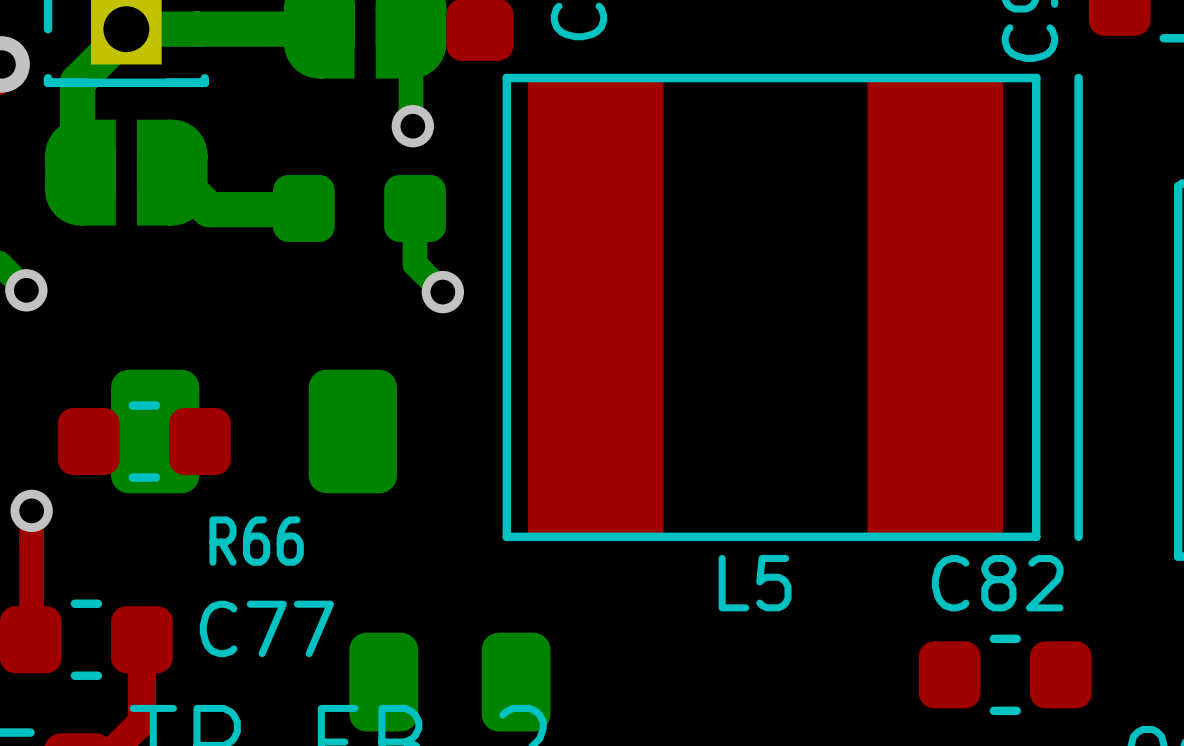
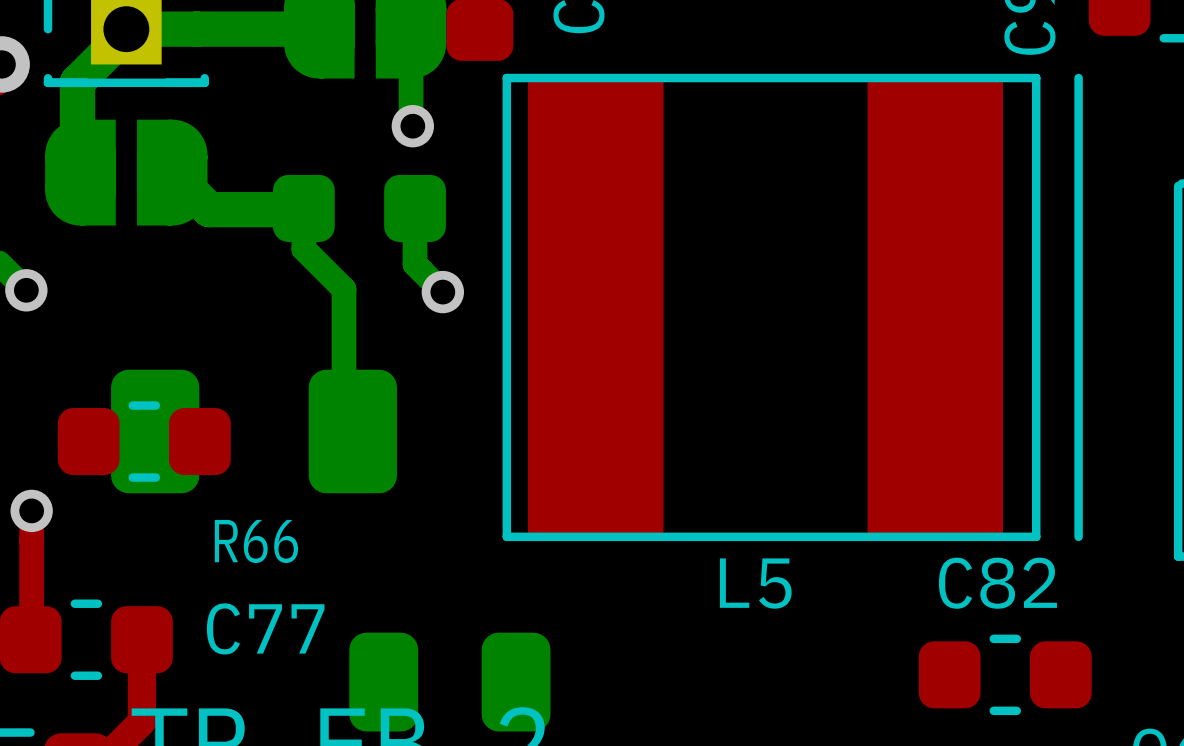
bottom track: none -> (303, 208) (303, 249) (344, 289) (344, 431)

